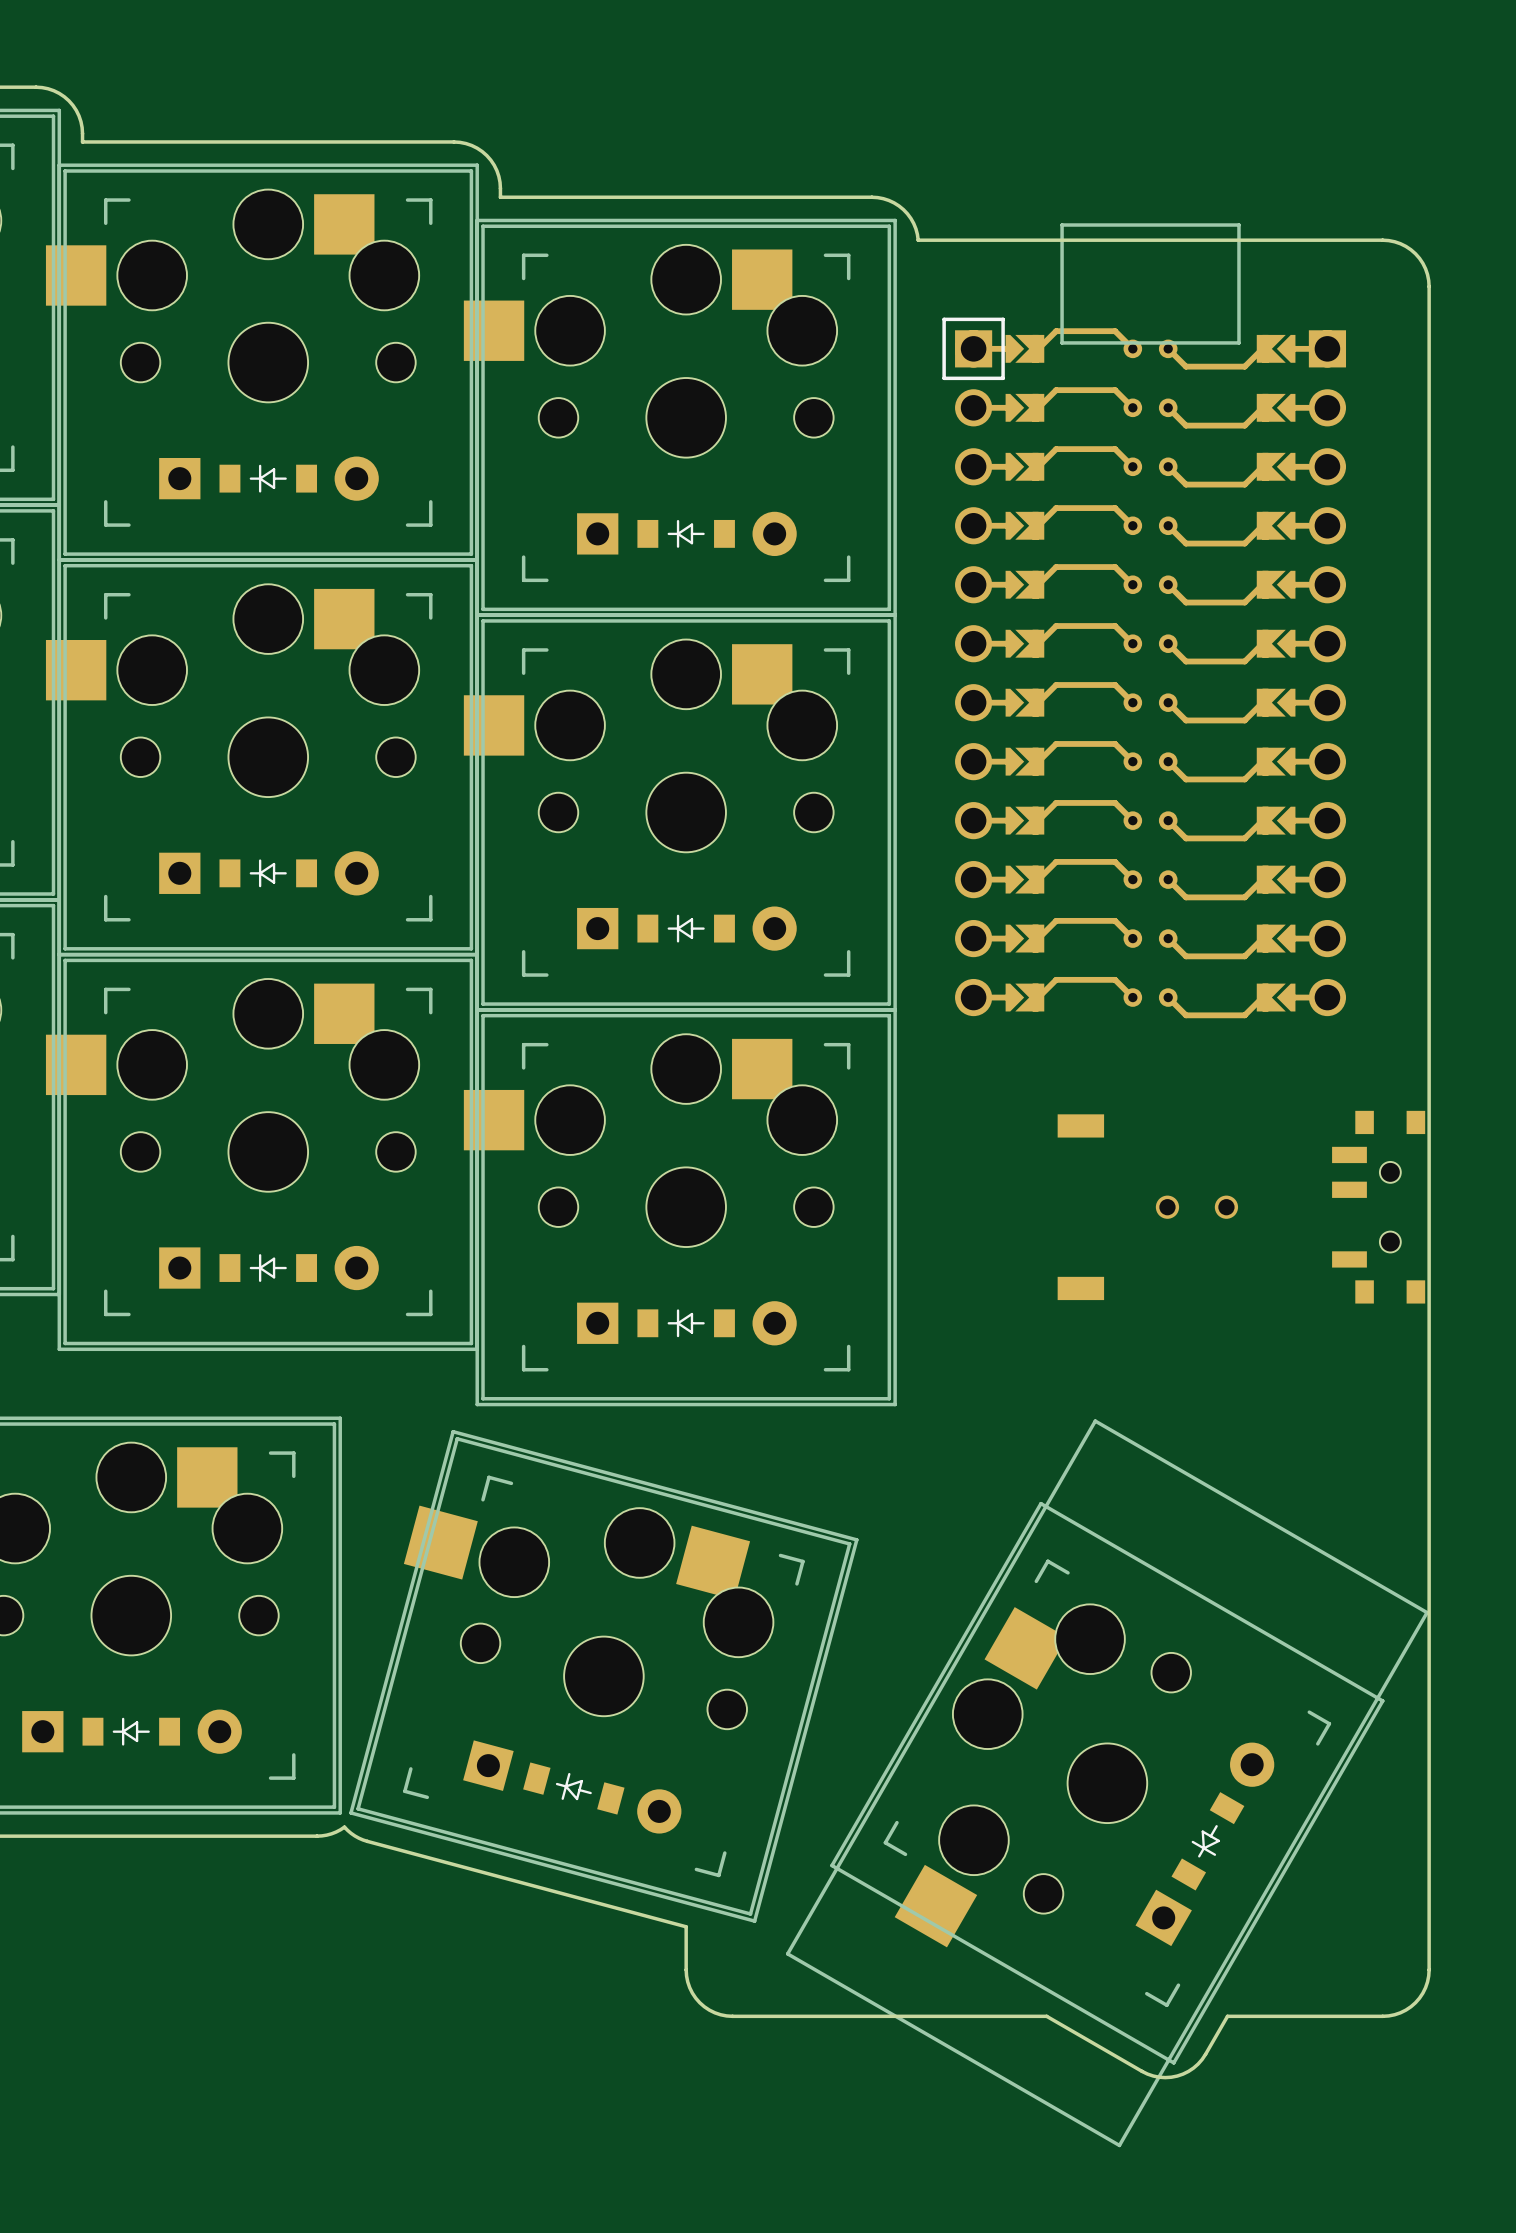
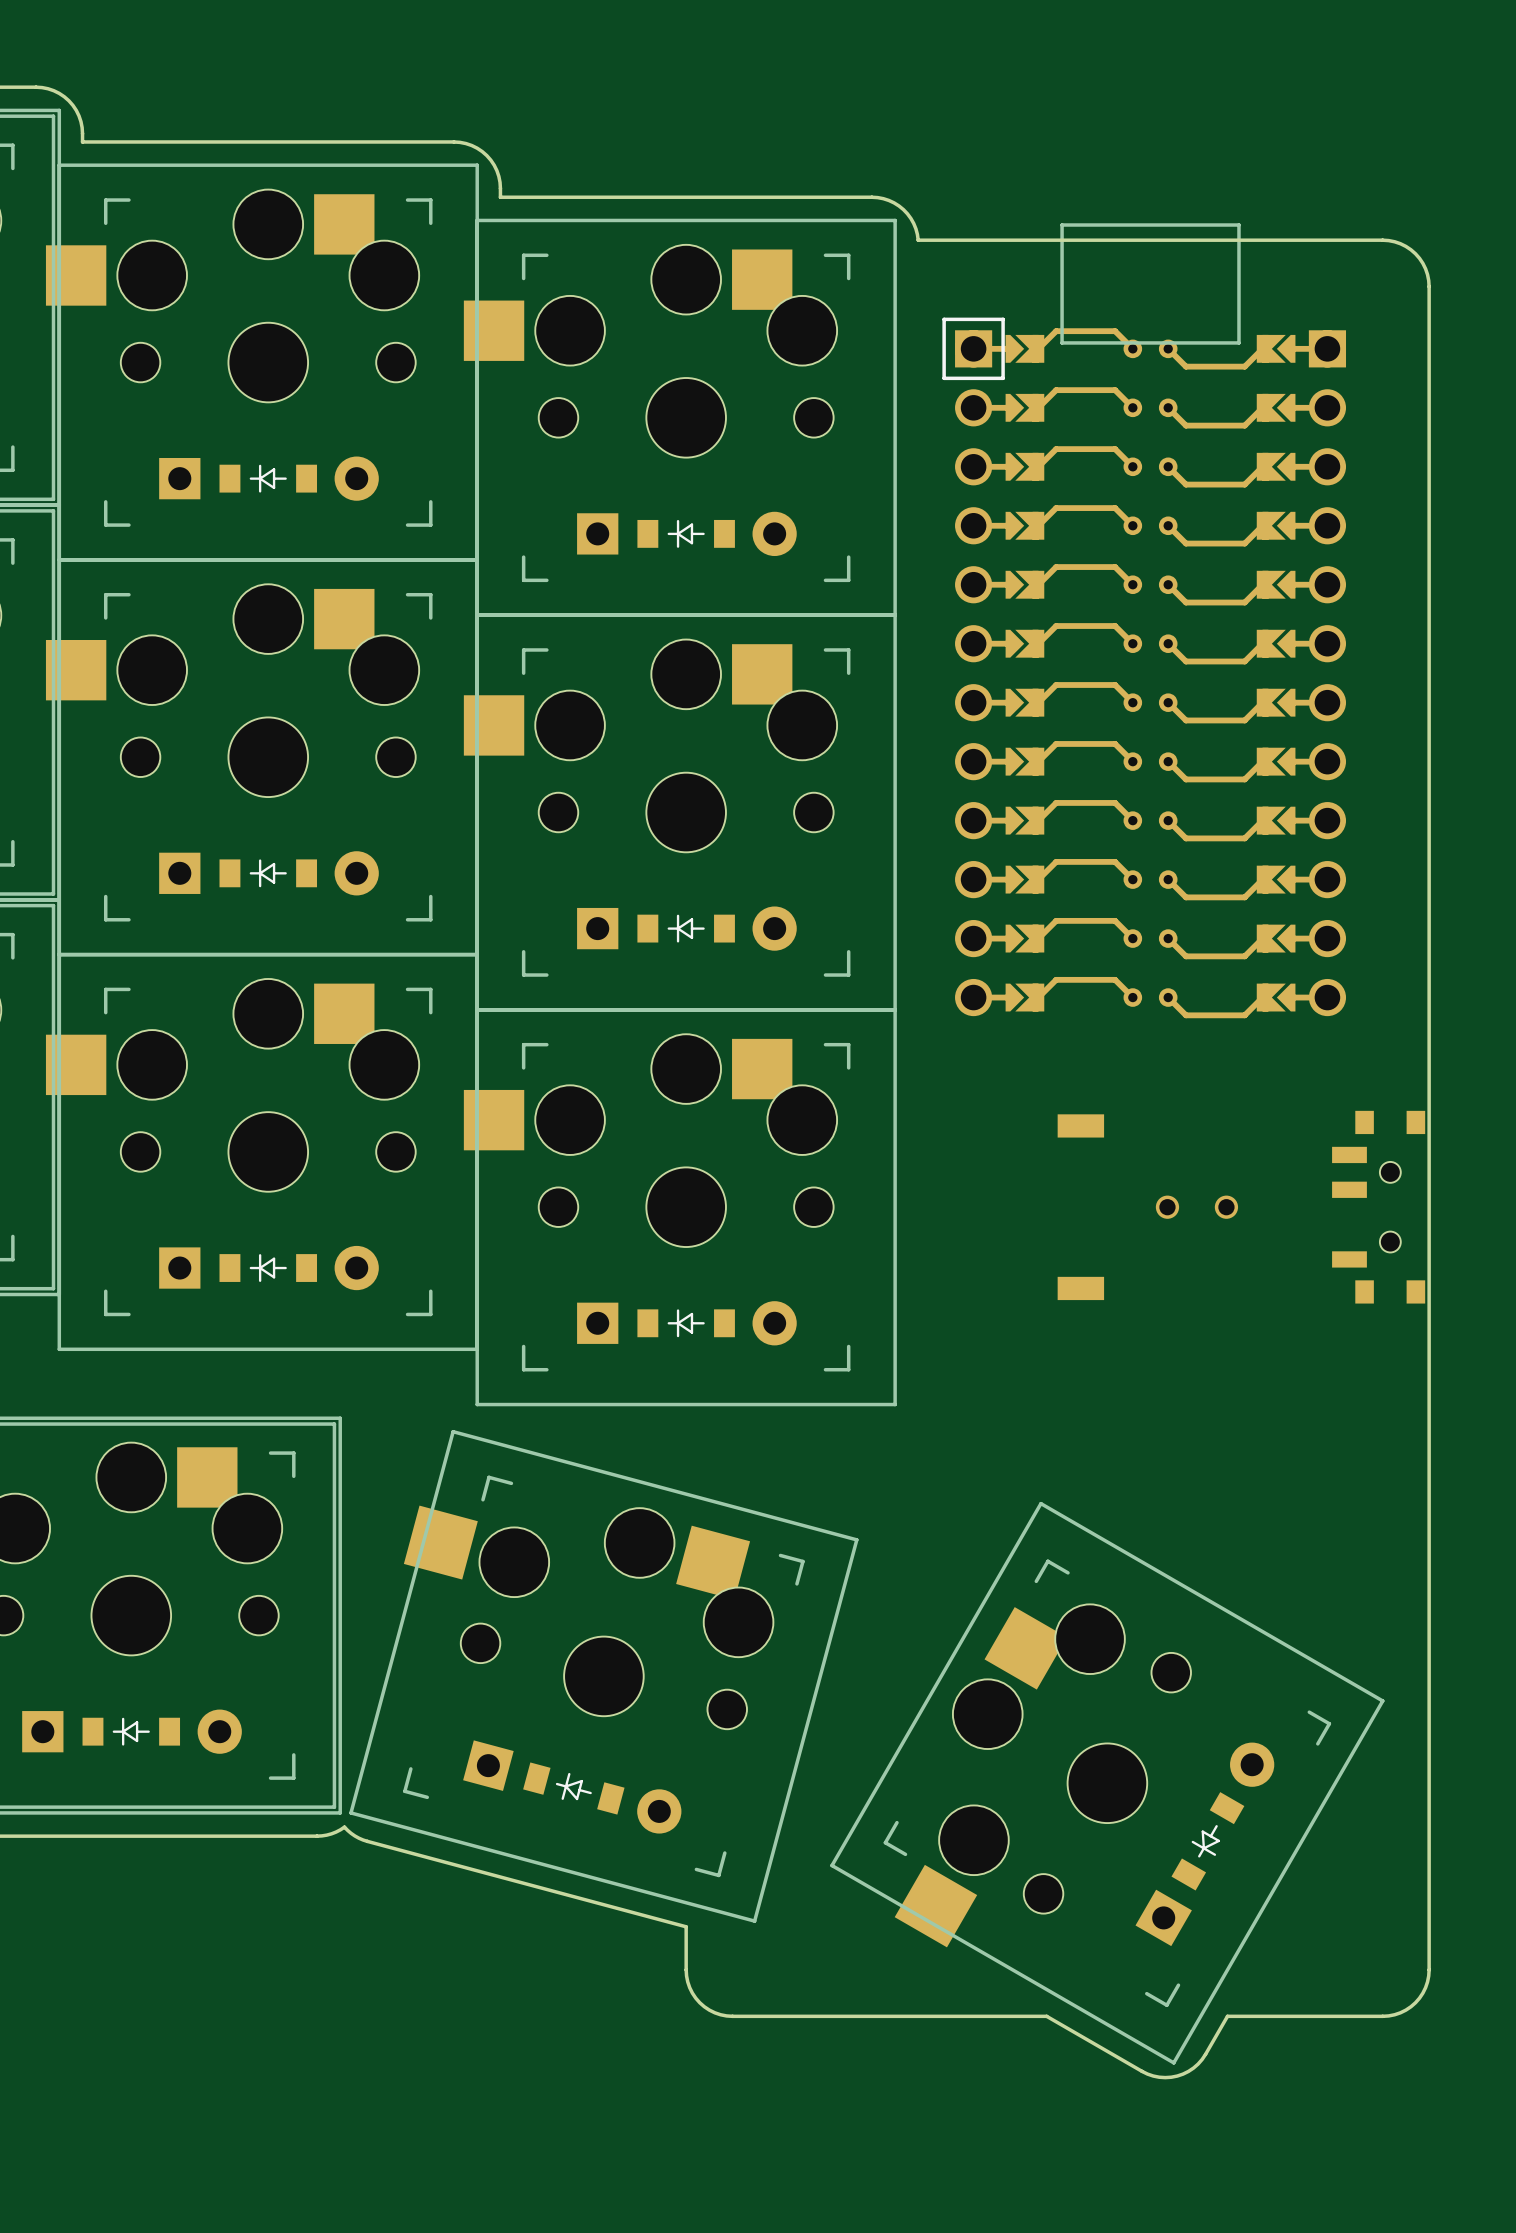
line: (65, 171) (65, 554) (471, 554) (471, 171) (65, 171) -> none
line: (483, 226) (483, 609) (889, 609) (889, 226) (483, 226) -> none
line: (65, 565) (65, 948) (471, 948) (471, 565) (65, 565) -> none
line: (483, 620) (483, 1004) (889, 1004) (889, 620) (483, 620) -> none
line: (65, 960) (471, 960) (471, 1343) (65, 1343) (65, 960) -> none
line: (483, 1015) (889, 1015) (889, 1398) (483, 1398) (483, 1015) -> none
line: (1095, 1421) (1427, 1612) (1119, 2145) (787, 1953) (1095, 1421) -> none
line: (457, 1438) (849, 1543) (750, 1914) (358, 1808) (457, 1438) -> none

